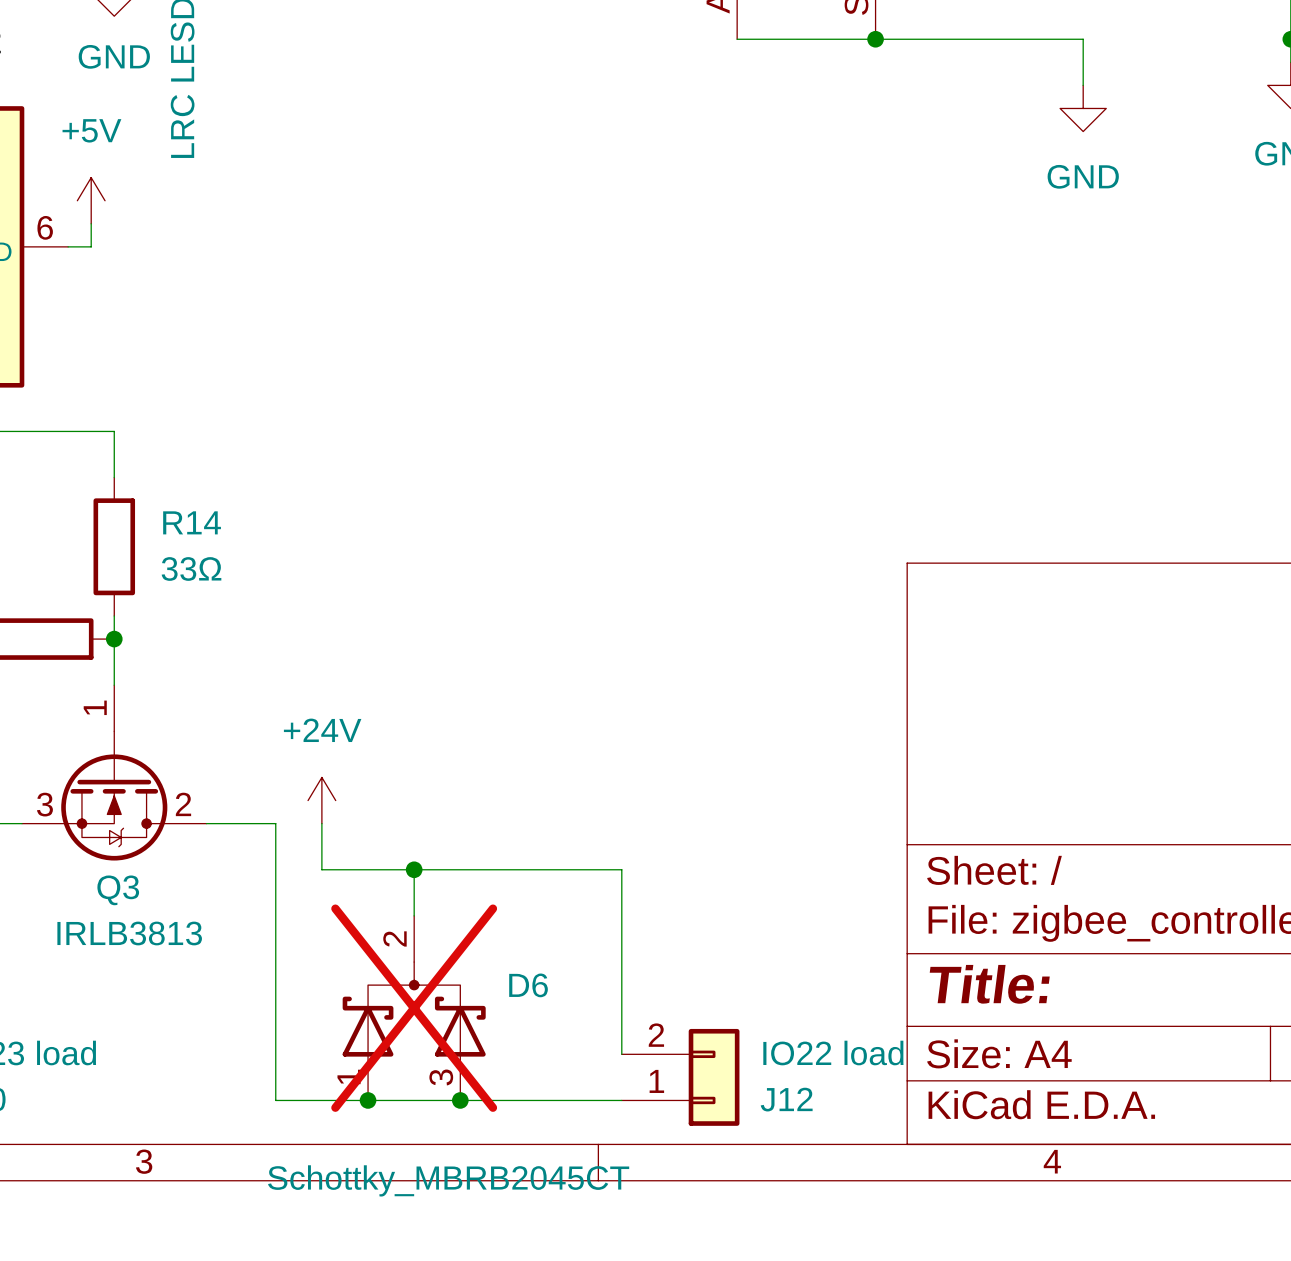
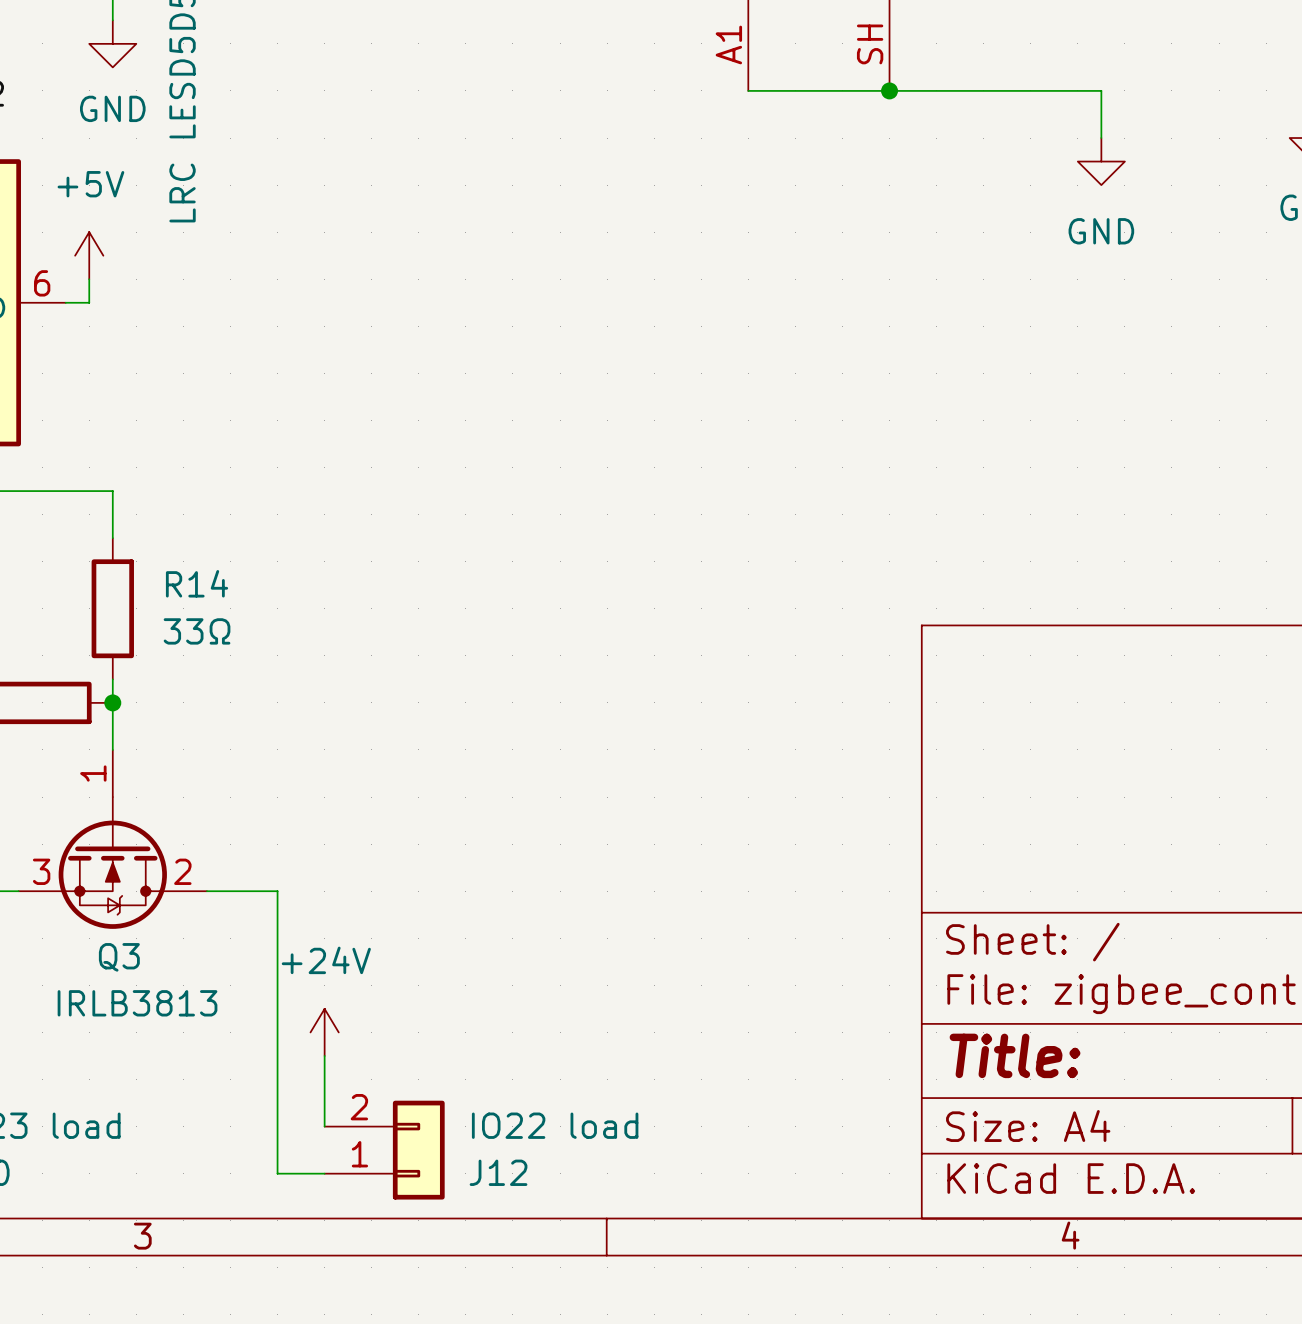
power symbol position: +24V (321, 800) -> +24V (324, 1032)
wire: (321, 823) (321, 869) (621, 869) (621, 1054) -> none
wire: (414, 869) (414, 915) -> none
junction: (414, 869) -> none
wire: none -> (324, 1055) (324, 1126)
D6: Schottky_MBRB2045CT (414, 1008) -> none
J12 position: (680, 1077) -> (384, 1150)
wire: (321, 1100) (621, 1100) -> none
junction: (368, 1100) -> none
junction: (460, 1100) -> none

